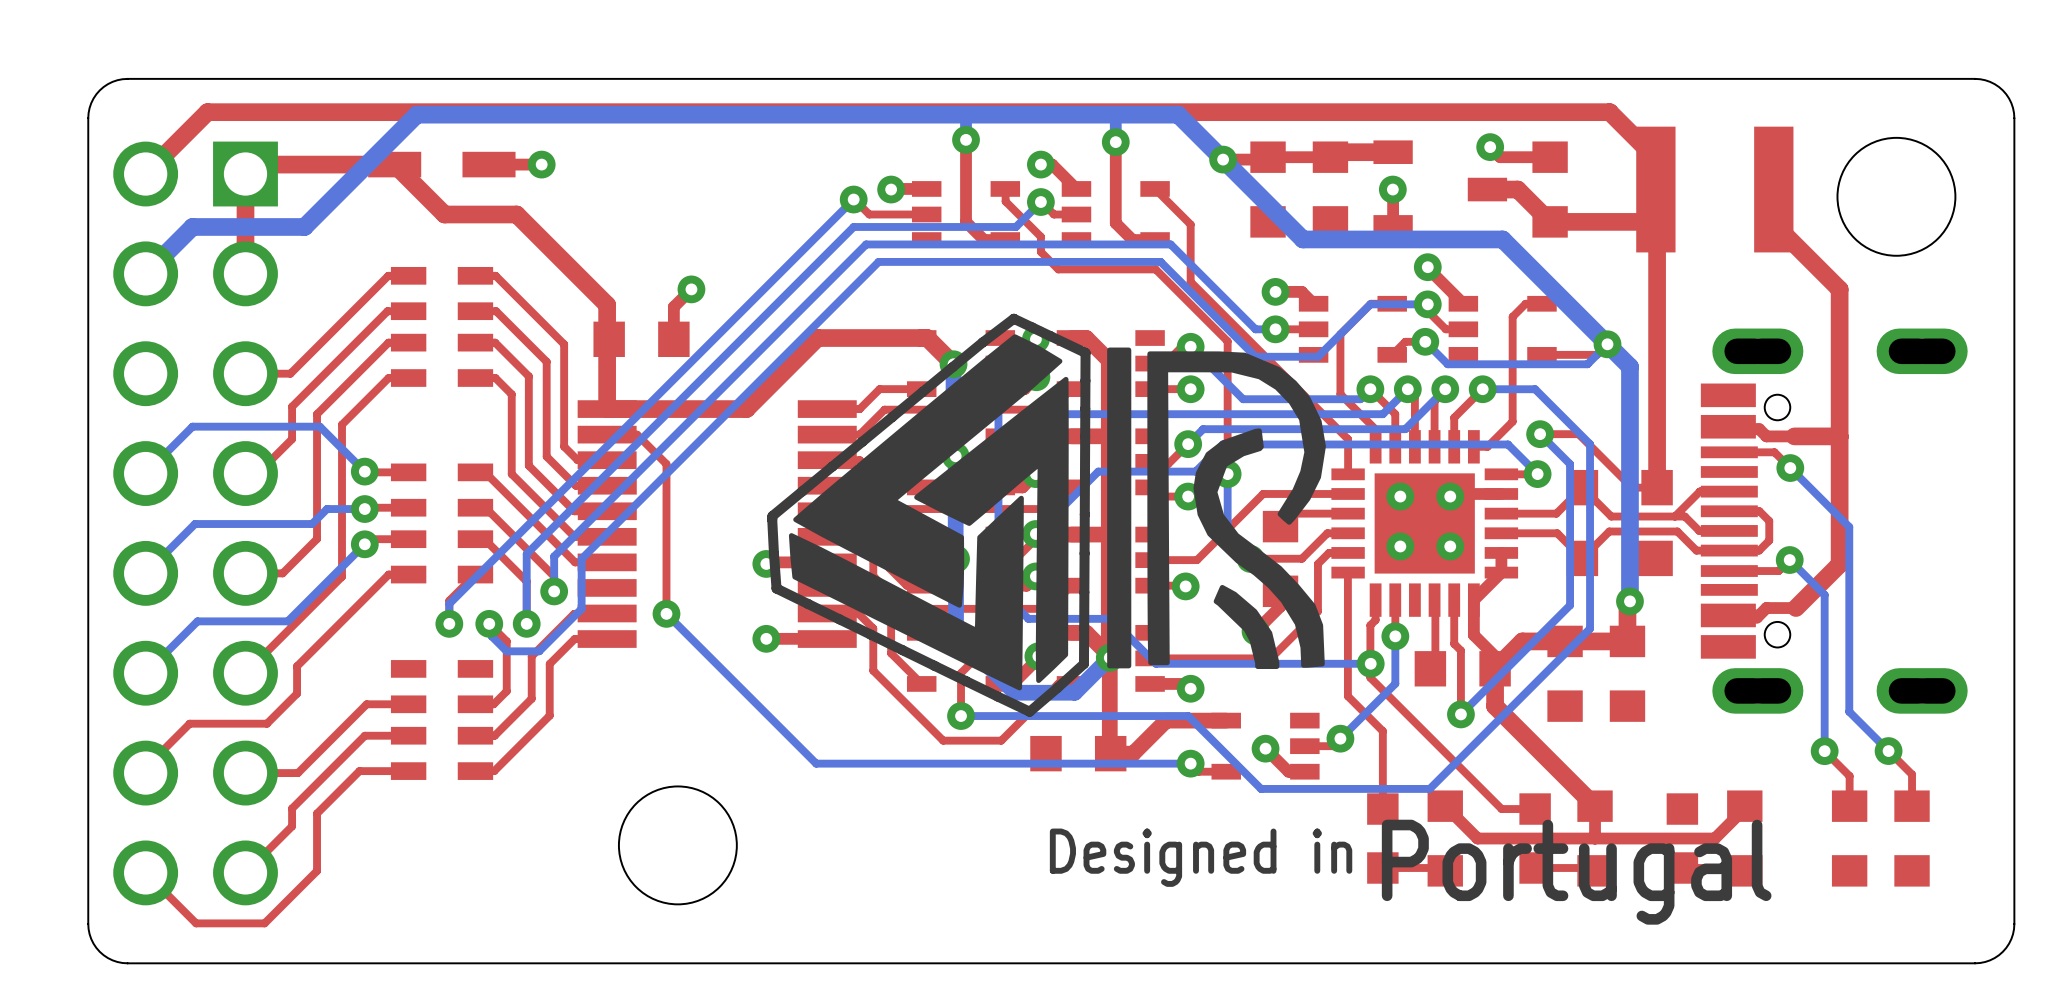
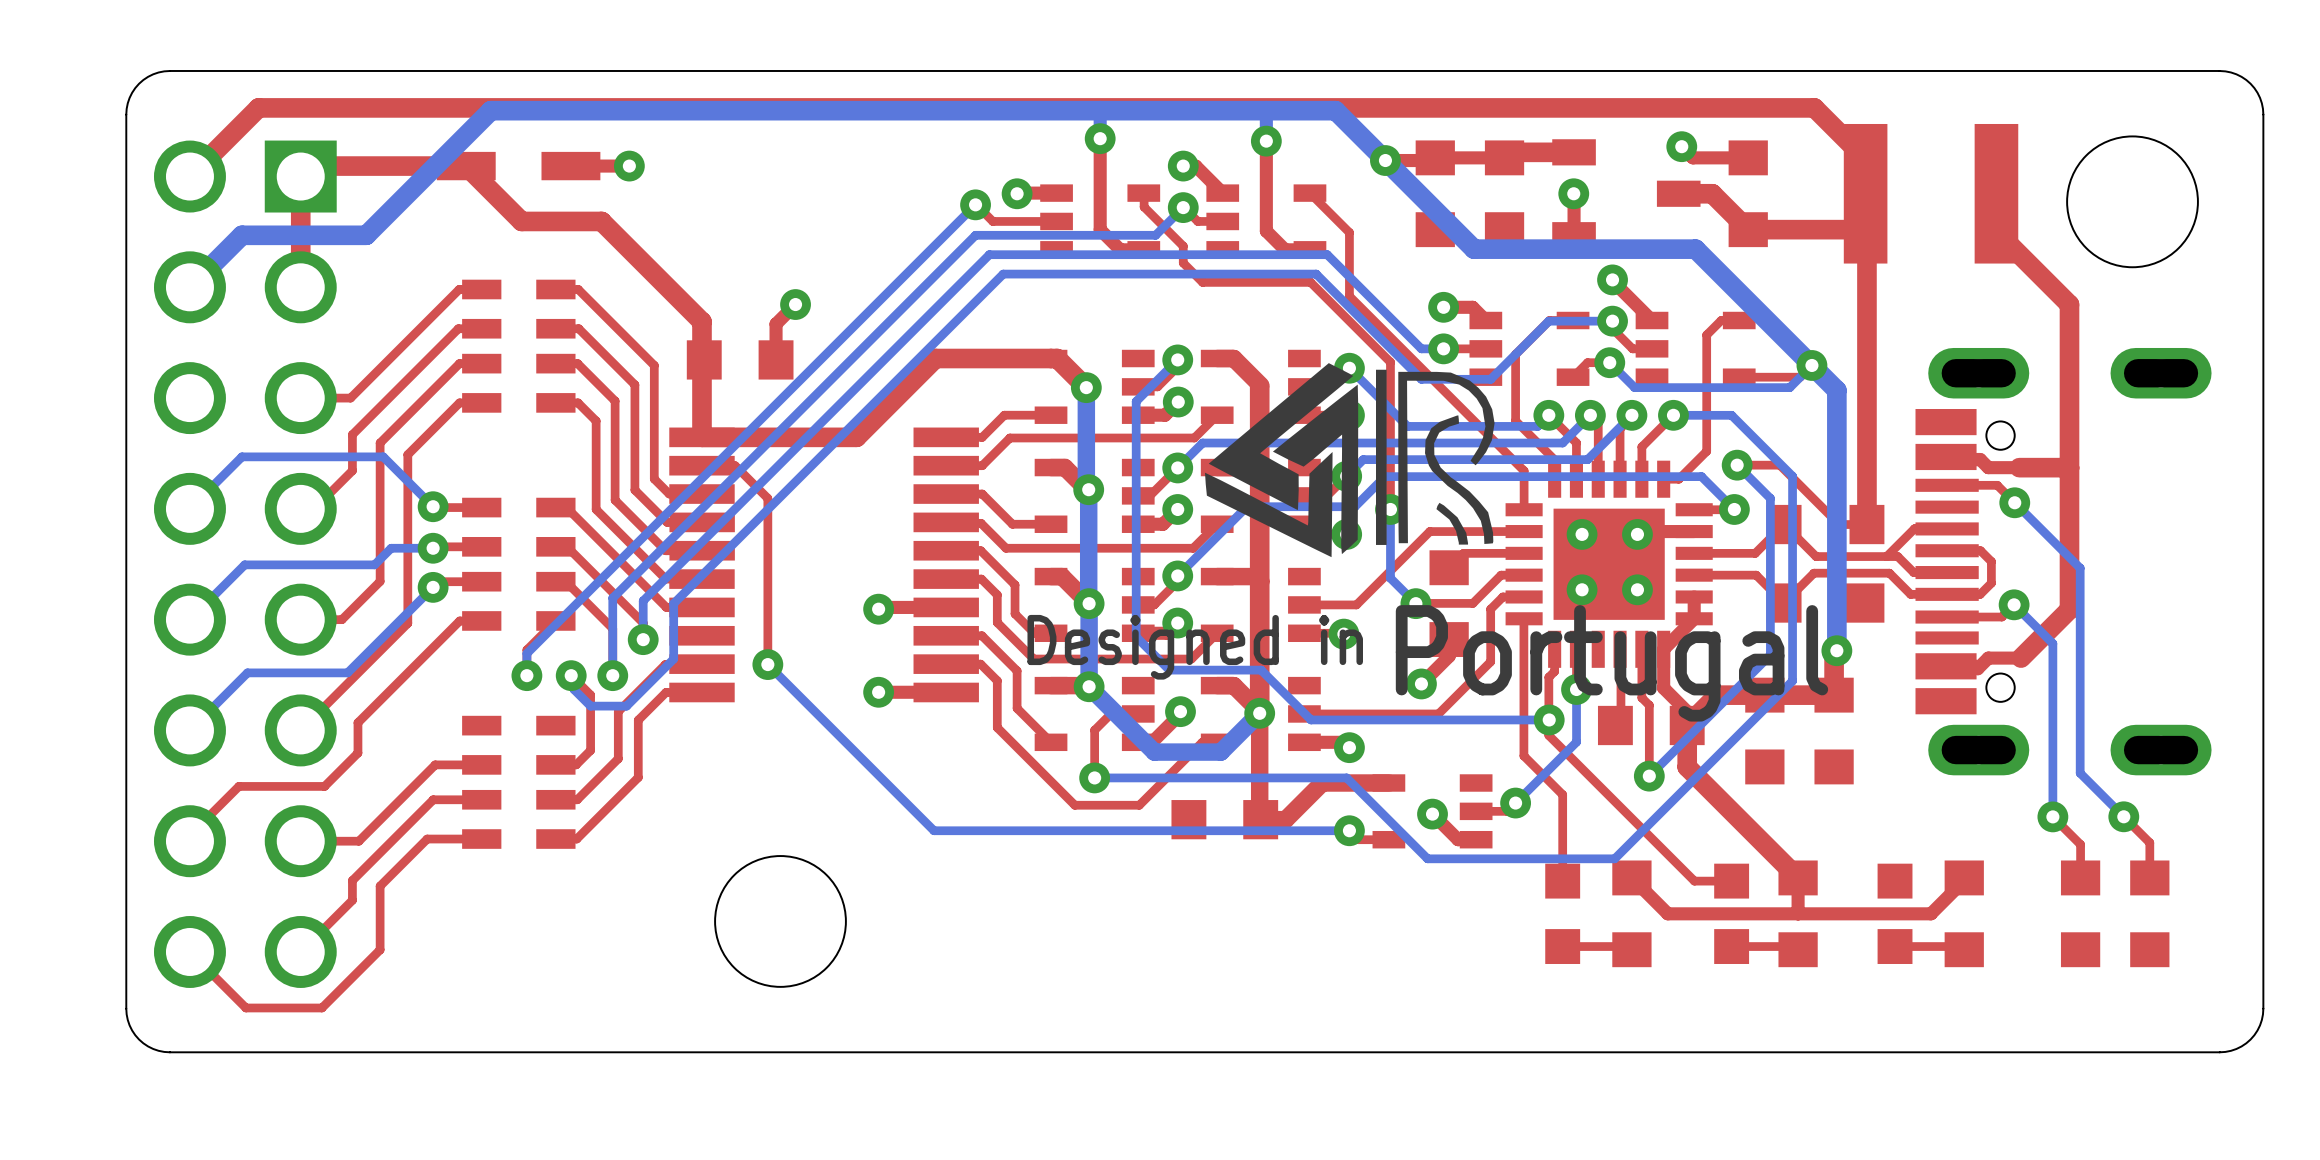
drawing: [767, 313, 1326, 717] -> none
drawing: none -> [1205, 363, 1495, 558]
drawing position: (1410, 872) -> (1427, 663)

